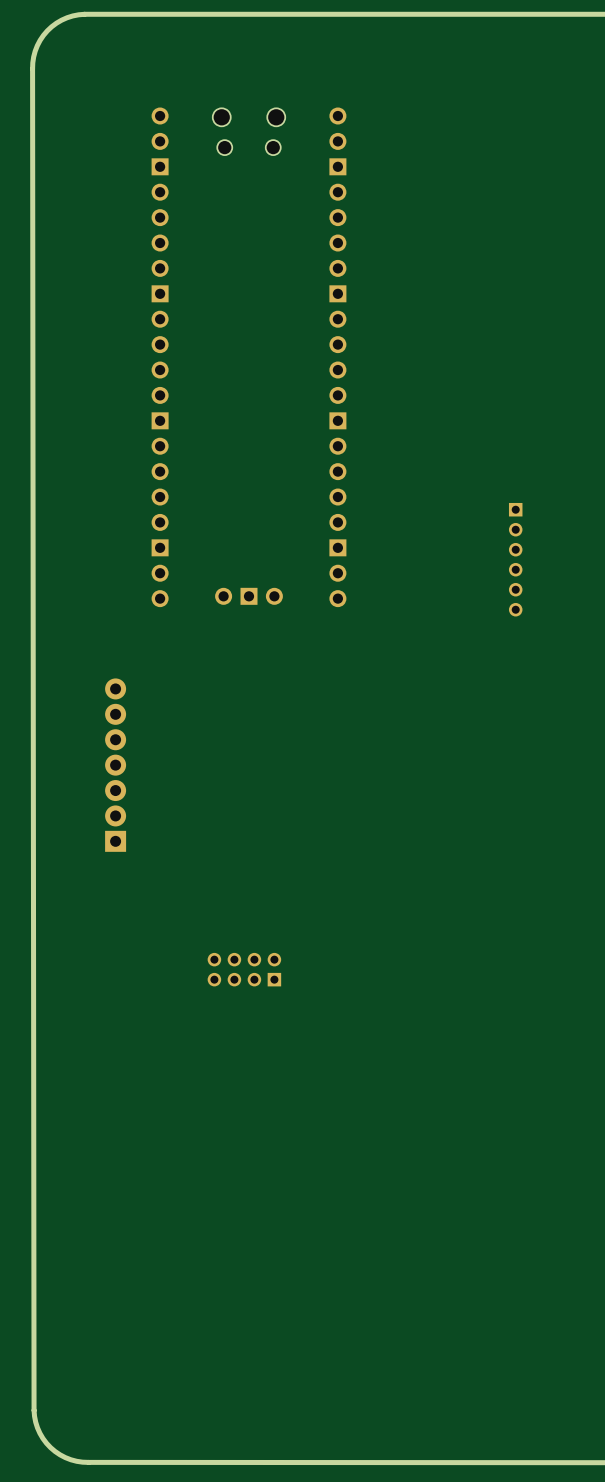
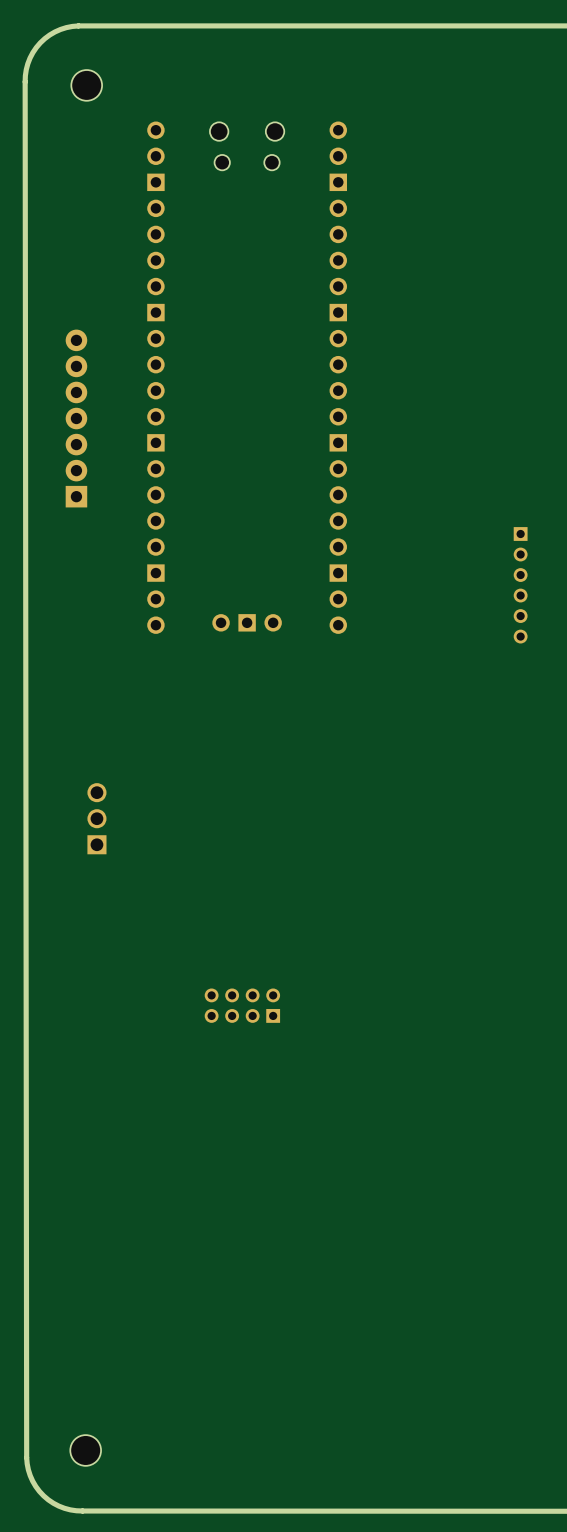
part: none -> (86, 85)
part: none -> (76, 418)
part: (115, 765) -> none
part: none -> (96, 818)
part: none -> (85, 1450)

